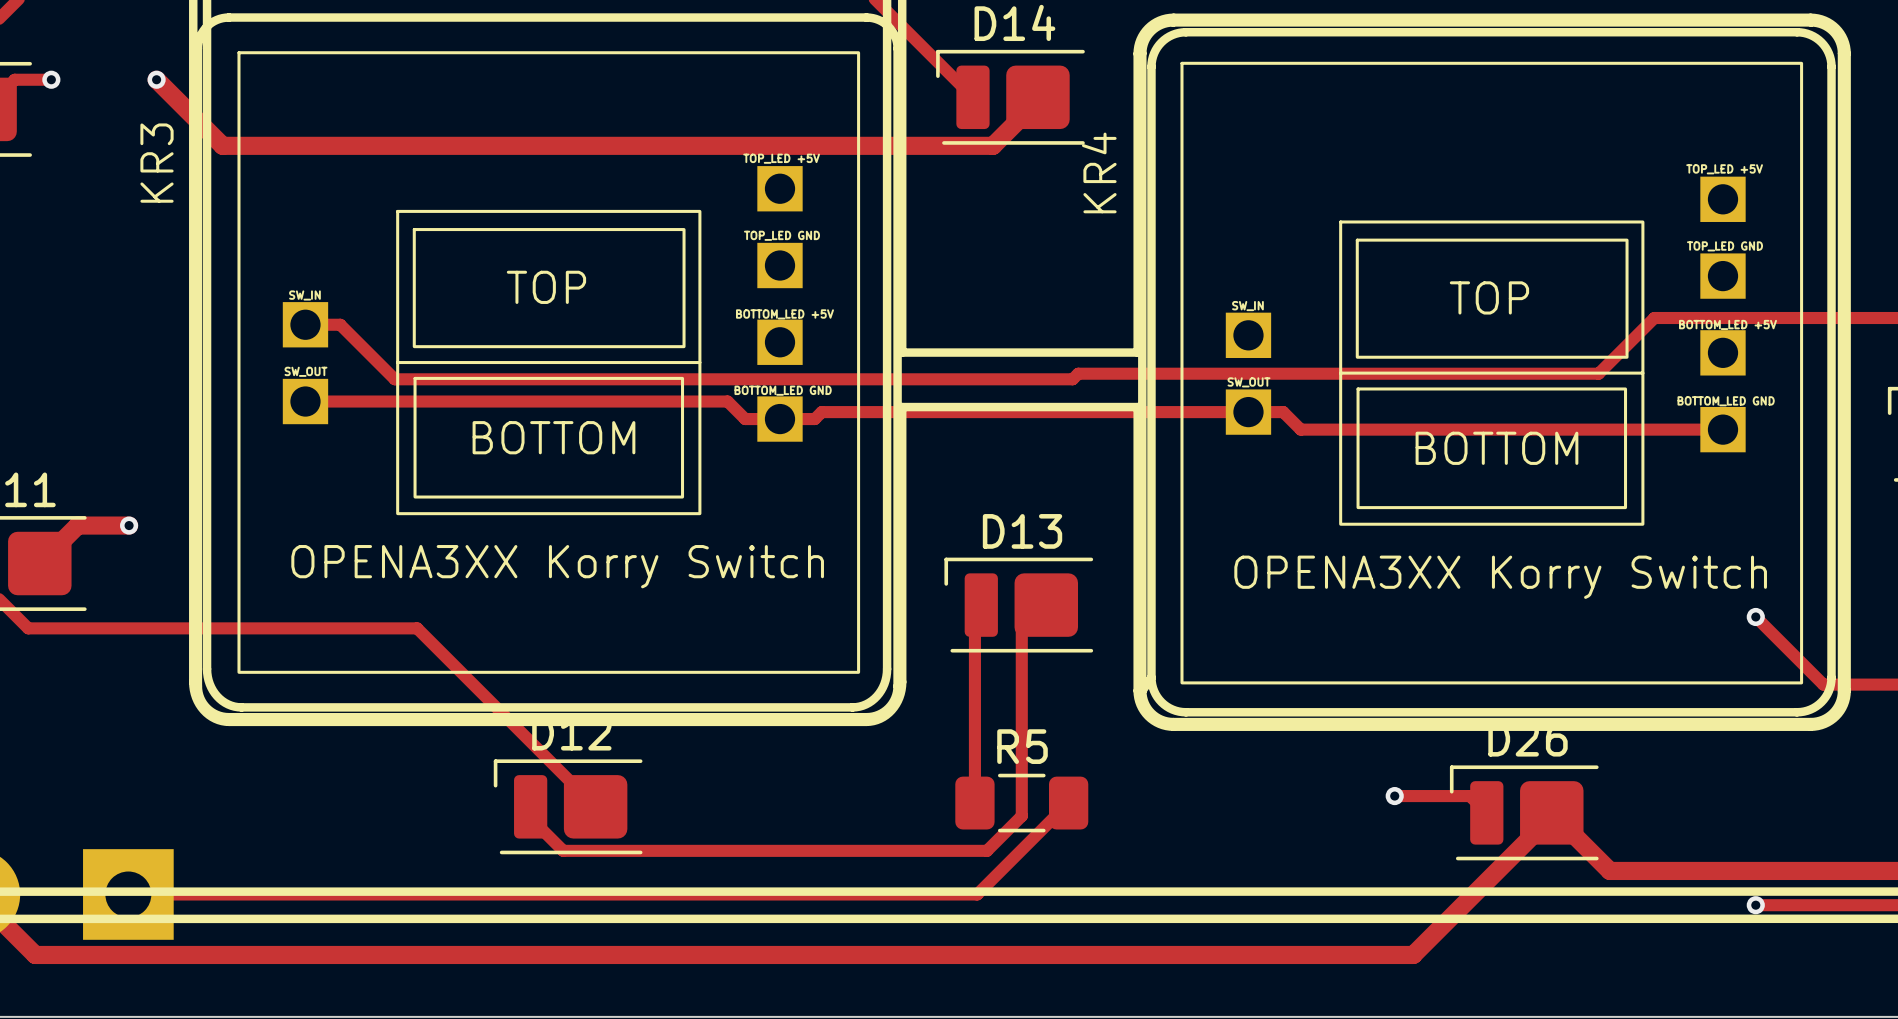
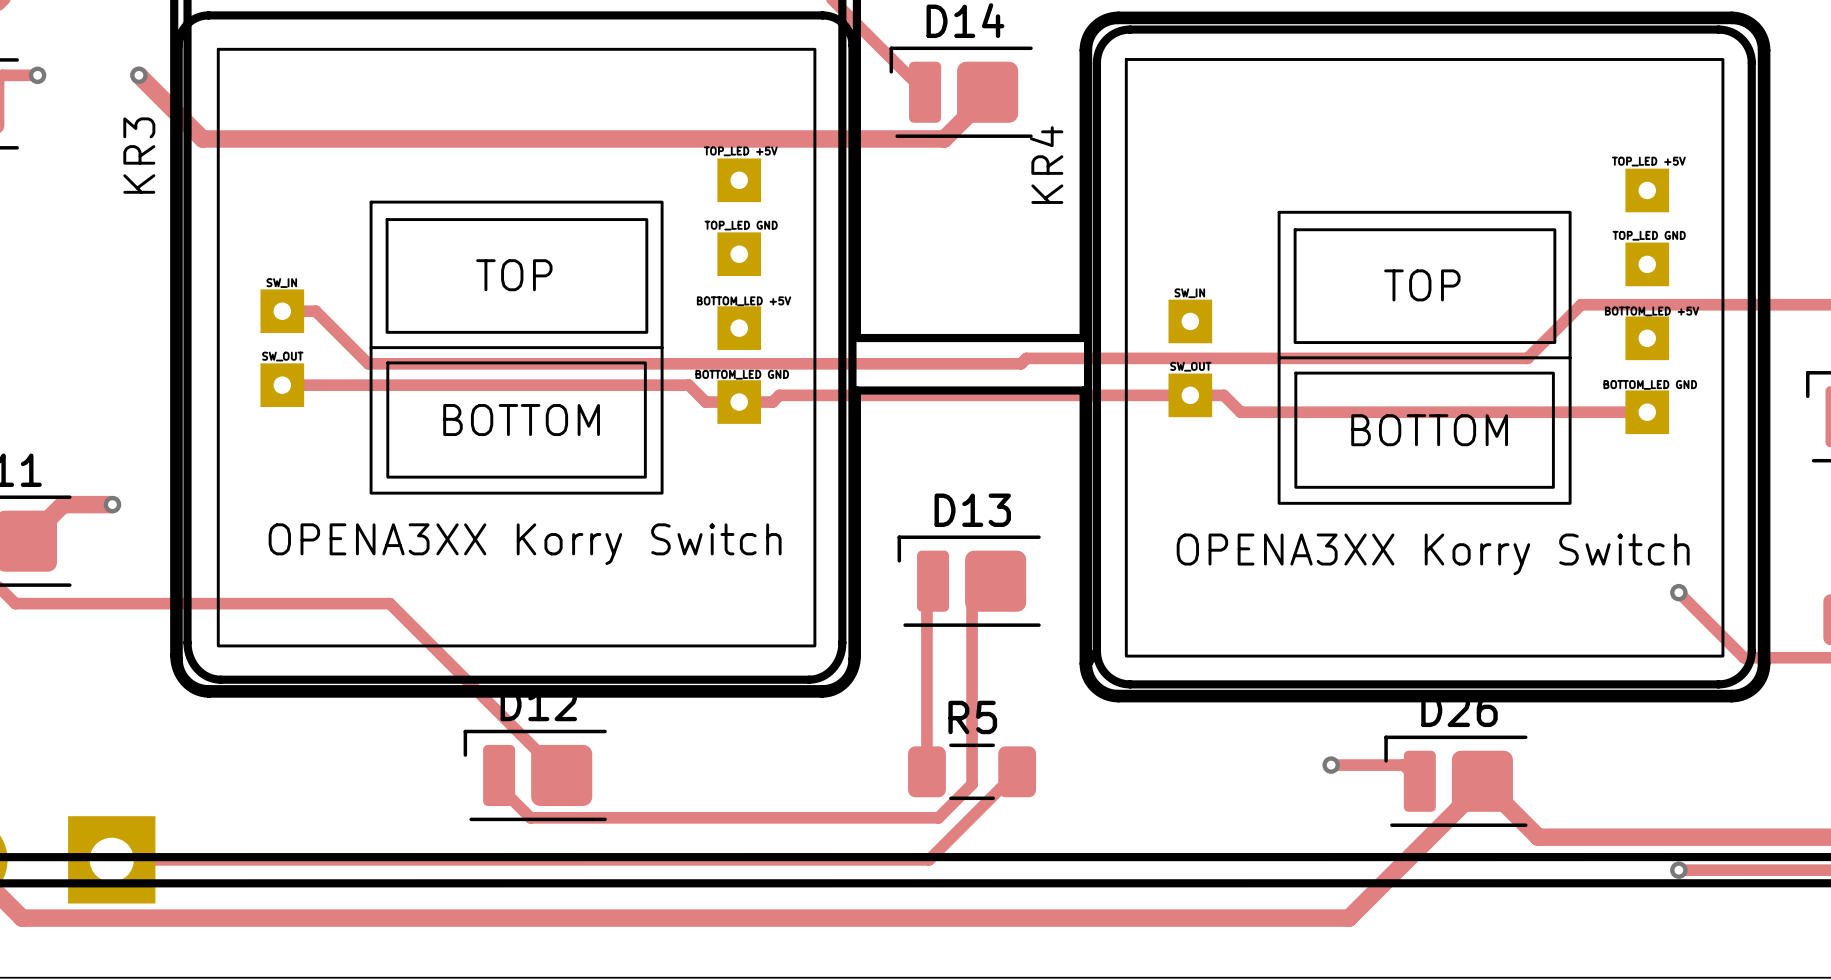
KR3 footprint: [237, 51, 861, 674] -> [216, 47, 817, 648]
KR4 footprint: [1180, 61, 1804, 685] -> [1124, 58, 1725, 658]

